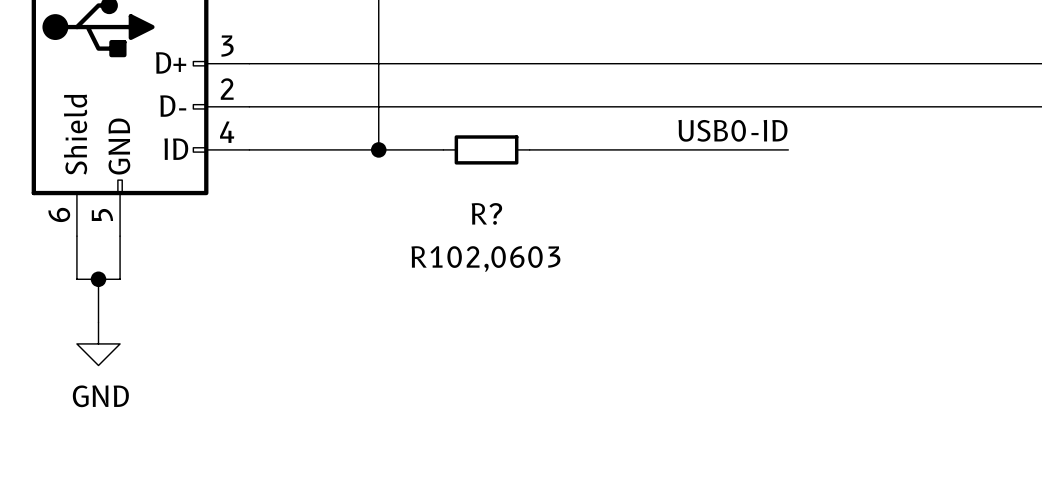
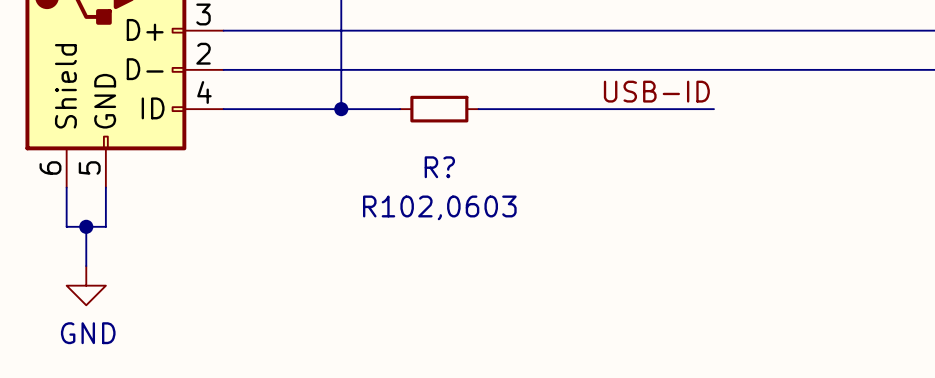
label: USB0-ID (732, 130) -> USB-ID (656, 91)

